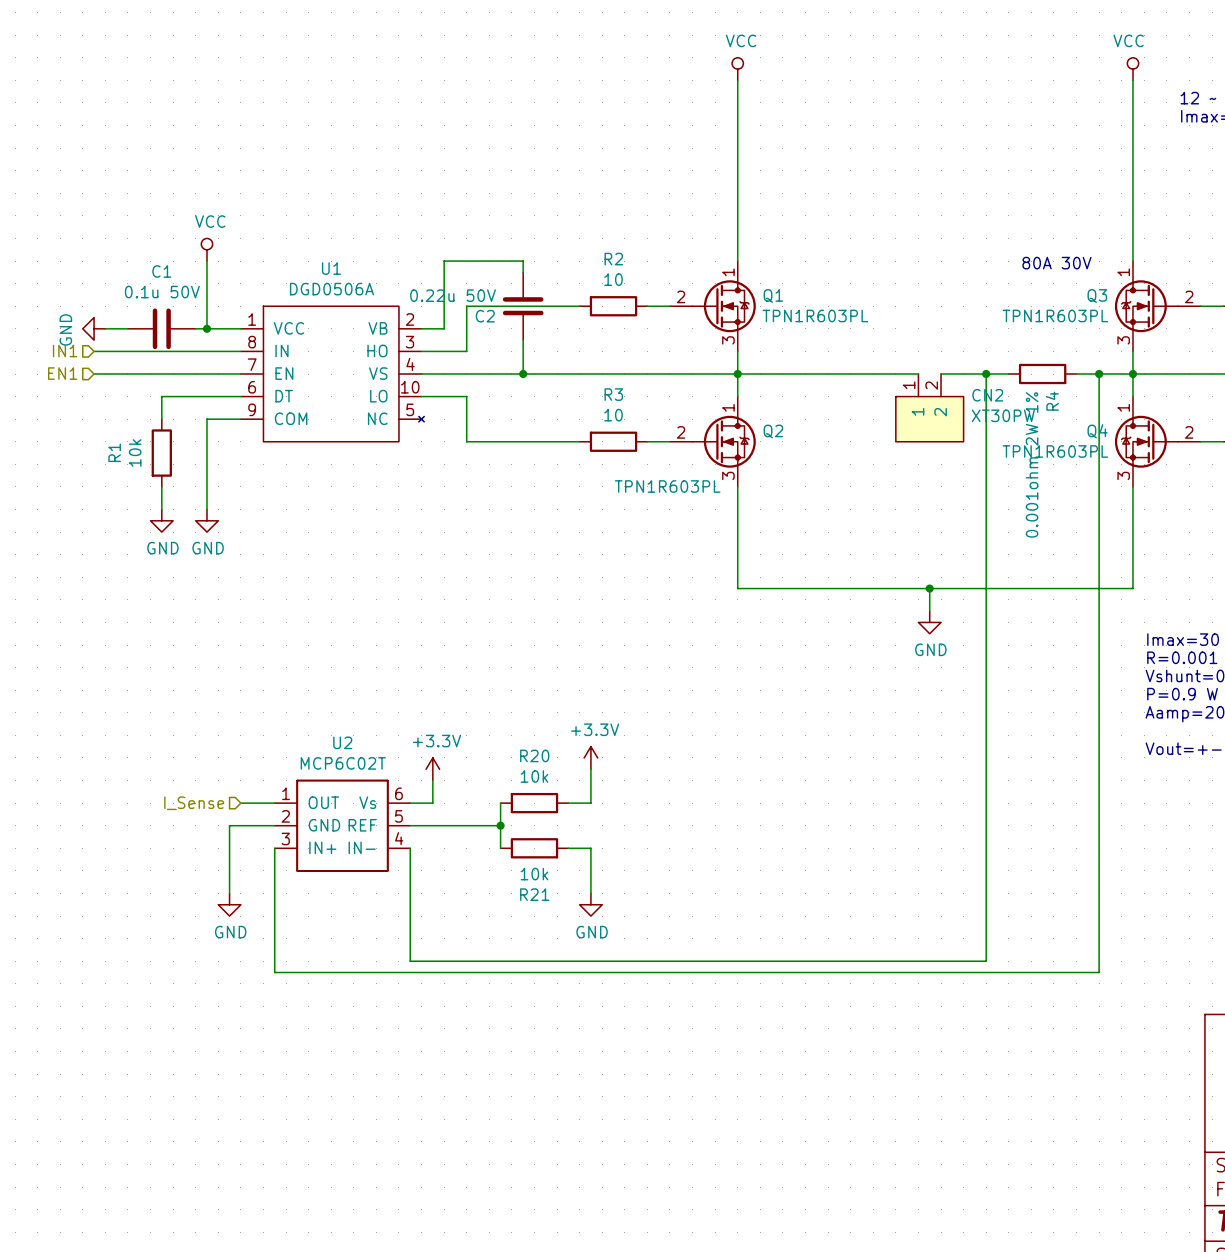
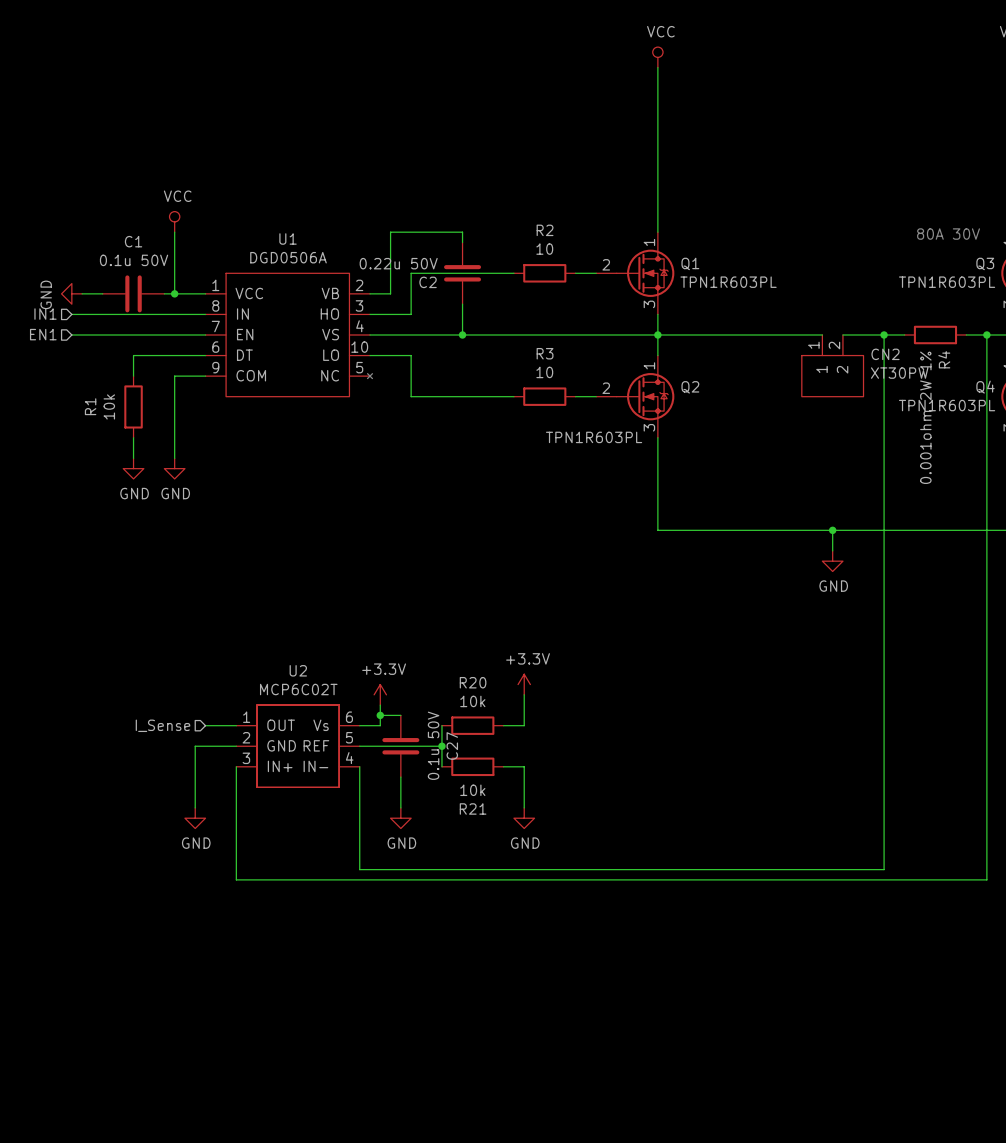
wire: none -> (380, 715) (400, 715)
junction: none -> (380, 715)
C27: none -> 0.1u 50V (400, 746)
wire: none -> (400, 777) (400, 807)
power symbol: none -> GND (400, 818)

